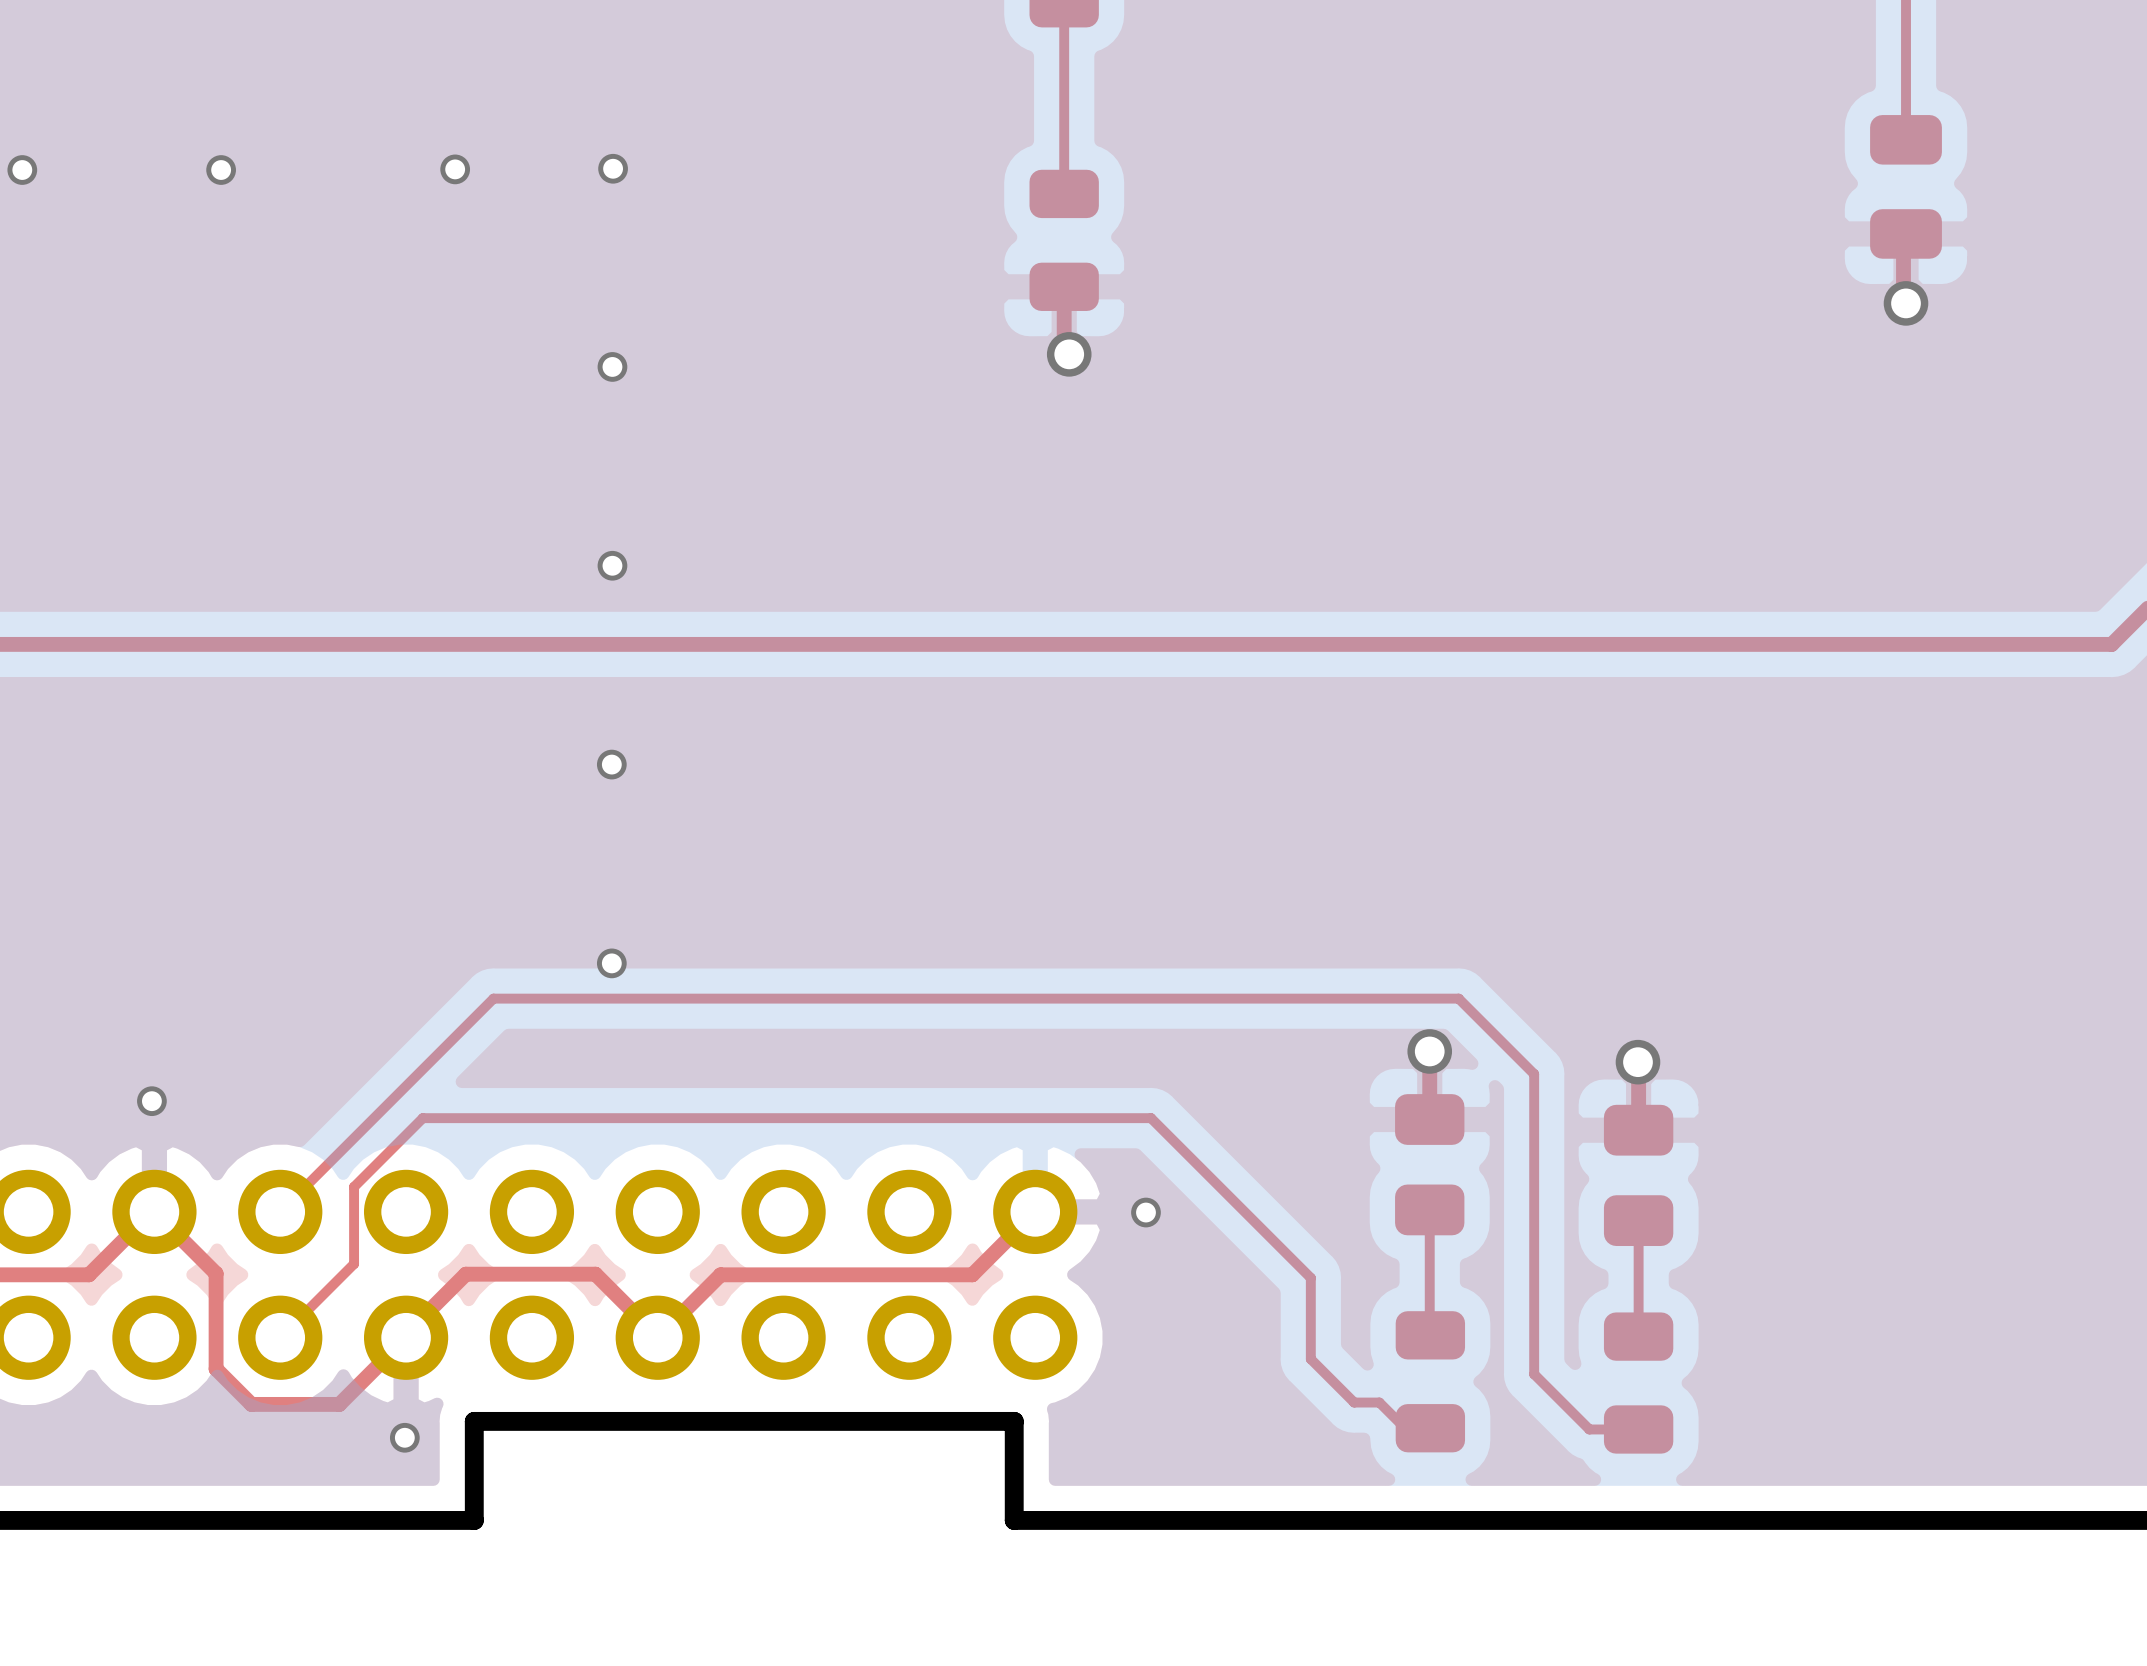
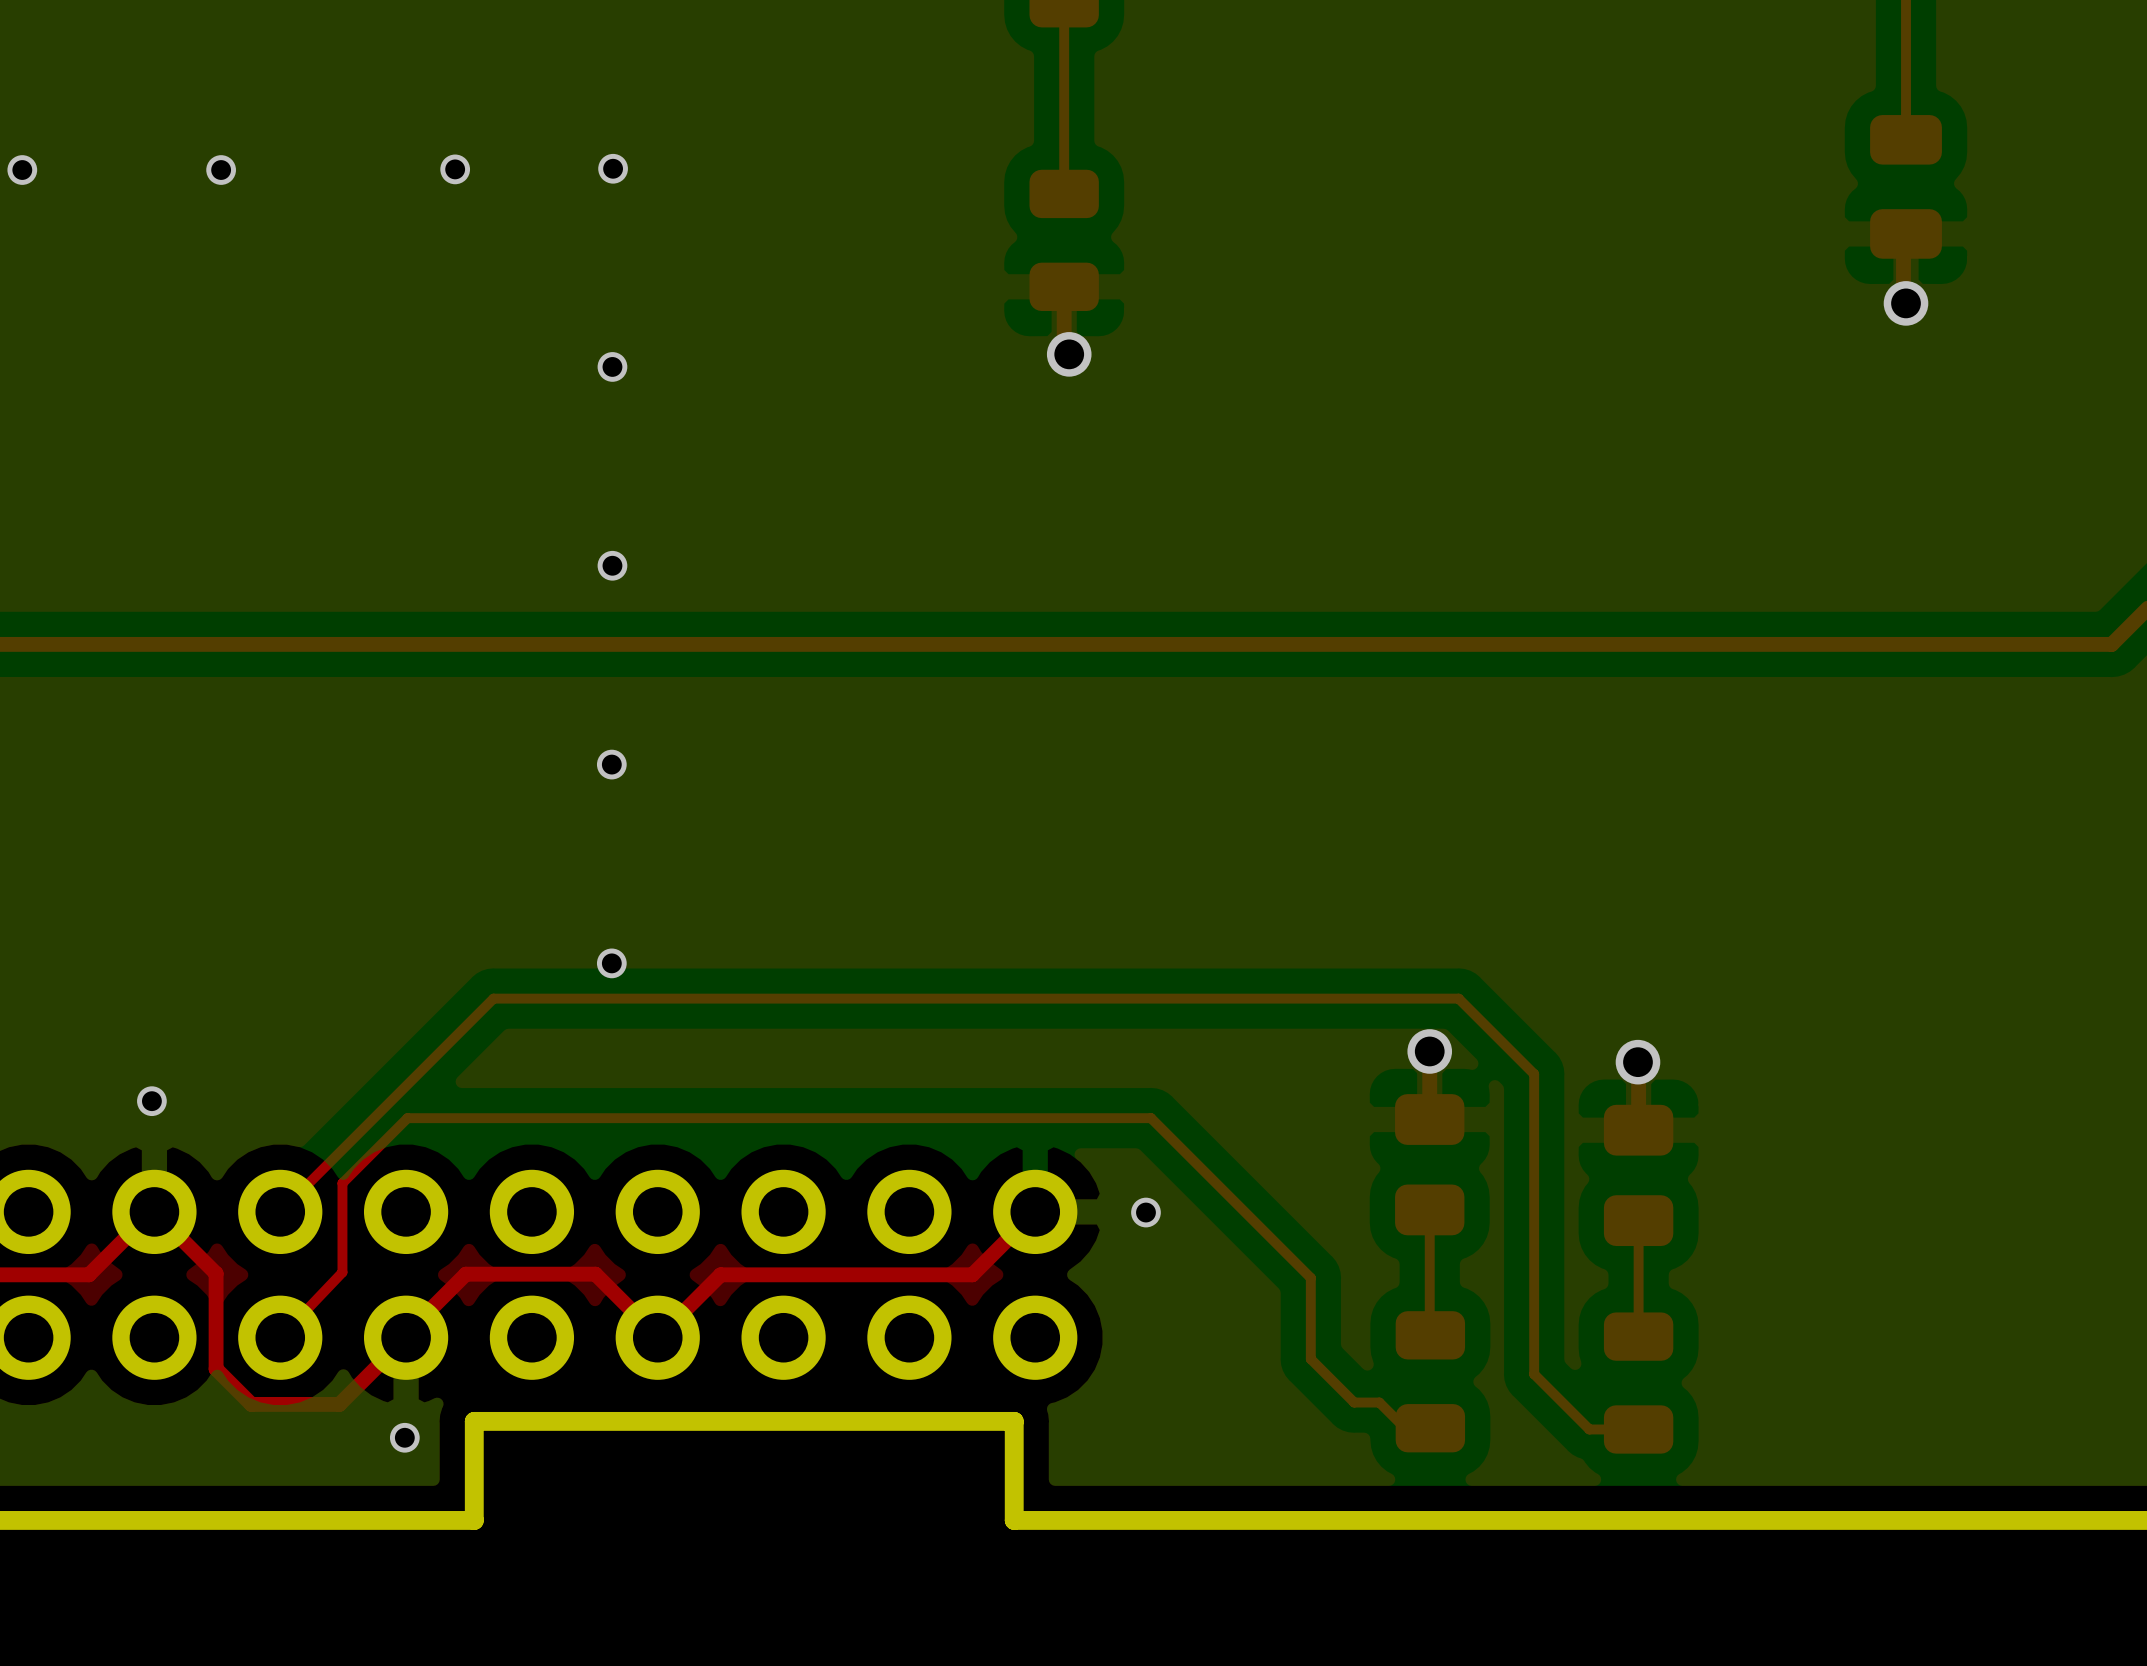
top track: (422, 1118) (354, 1186) (354, 1263) (280, 1337) -> (422, 1118) (407, 1118) (342, 1183) (342, 1272) (280, 1337)

